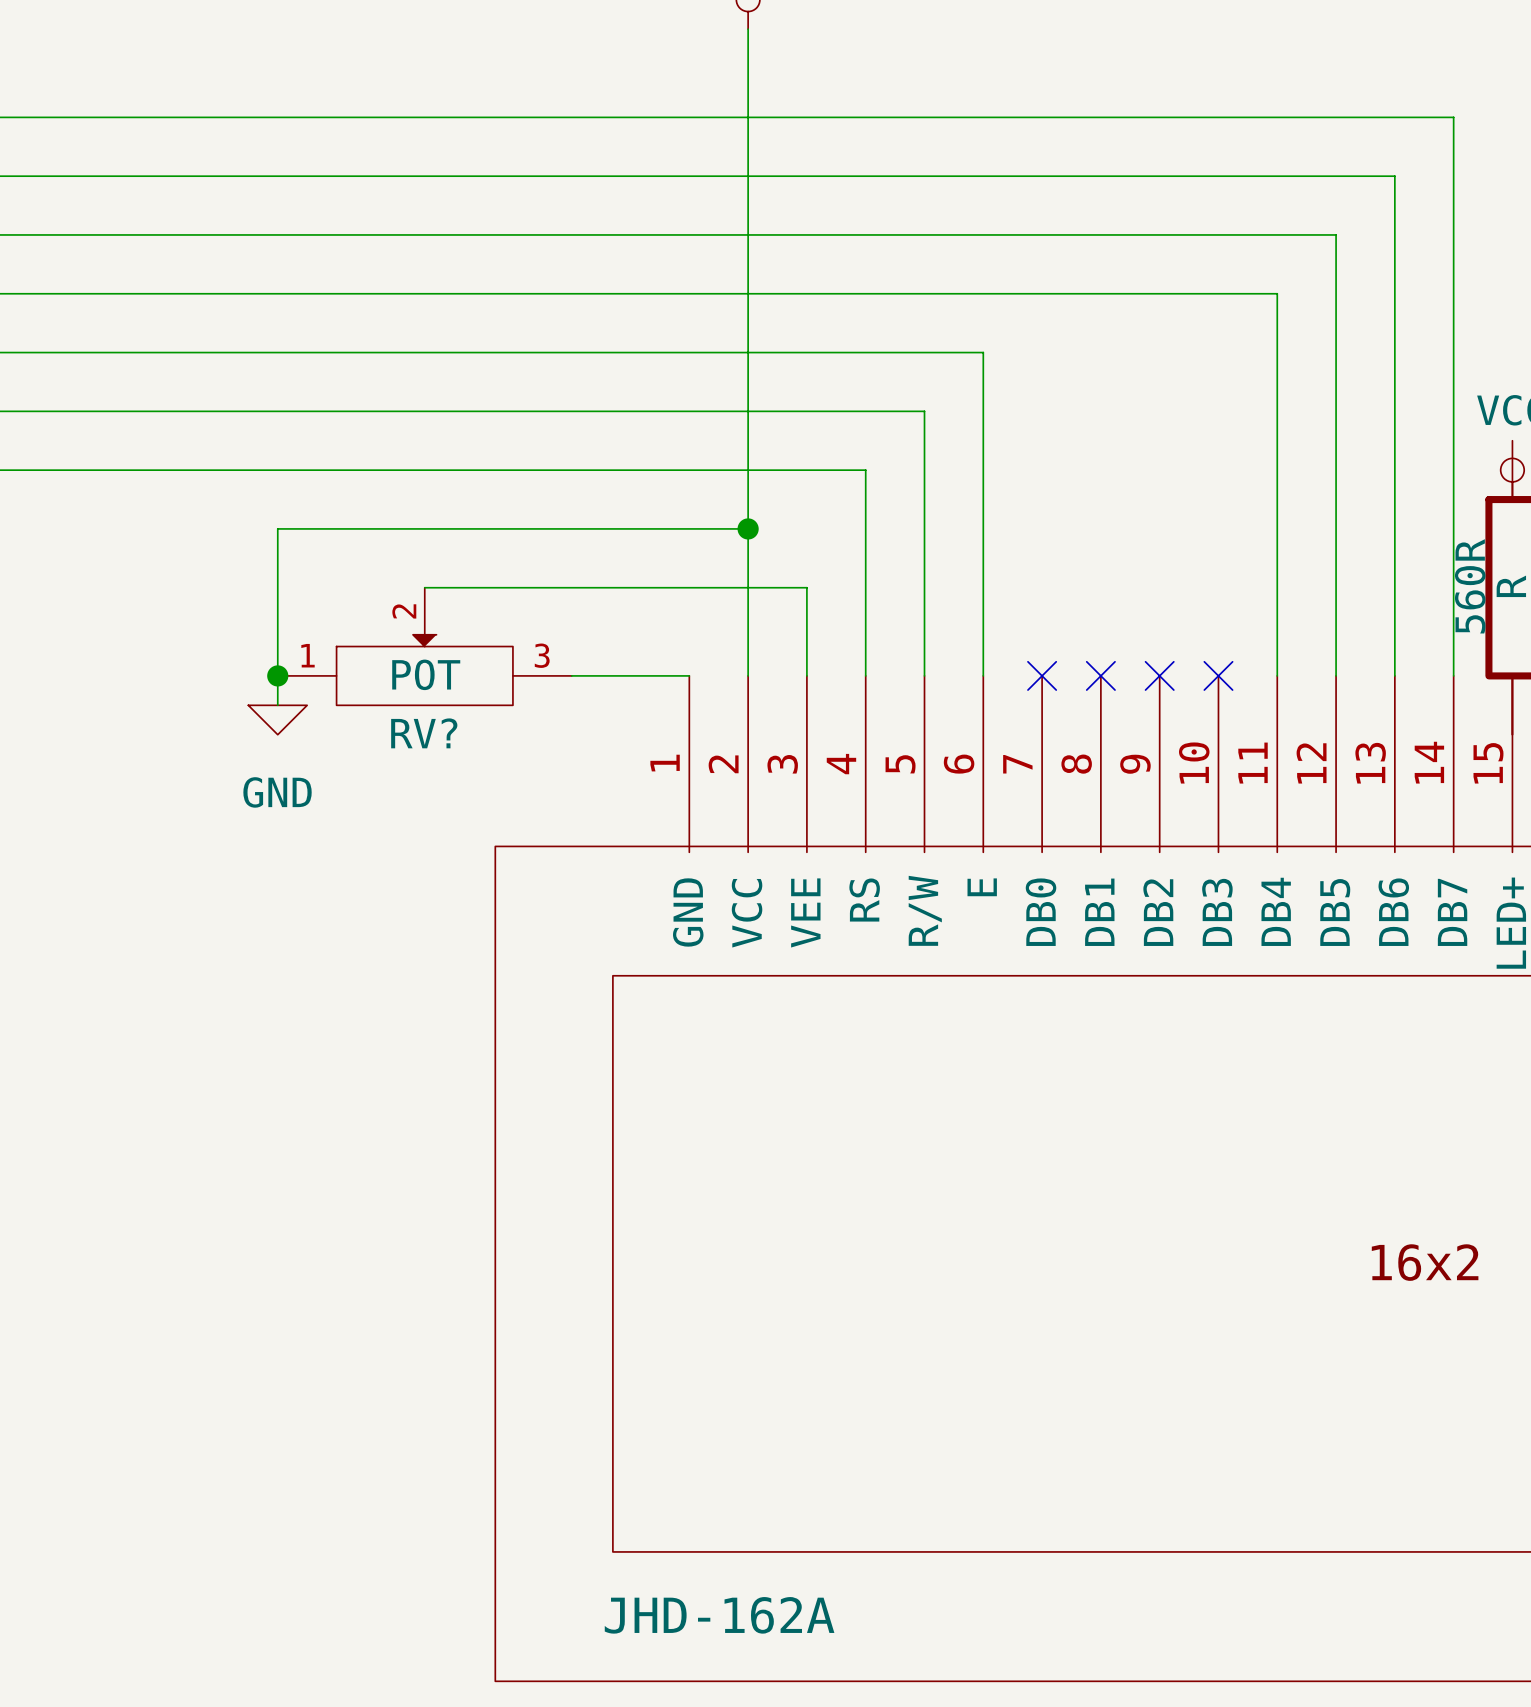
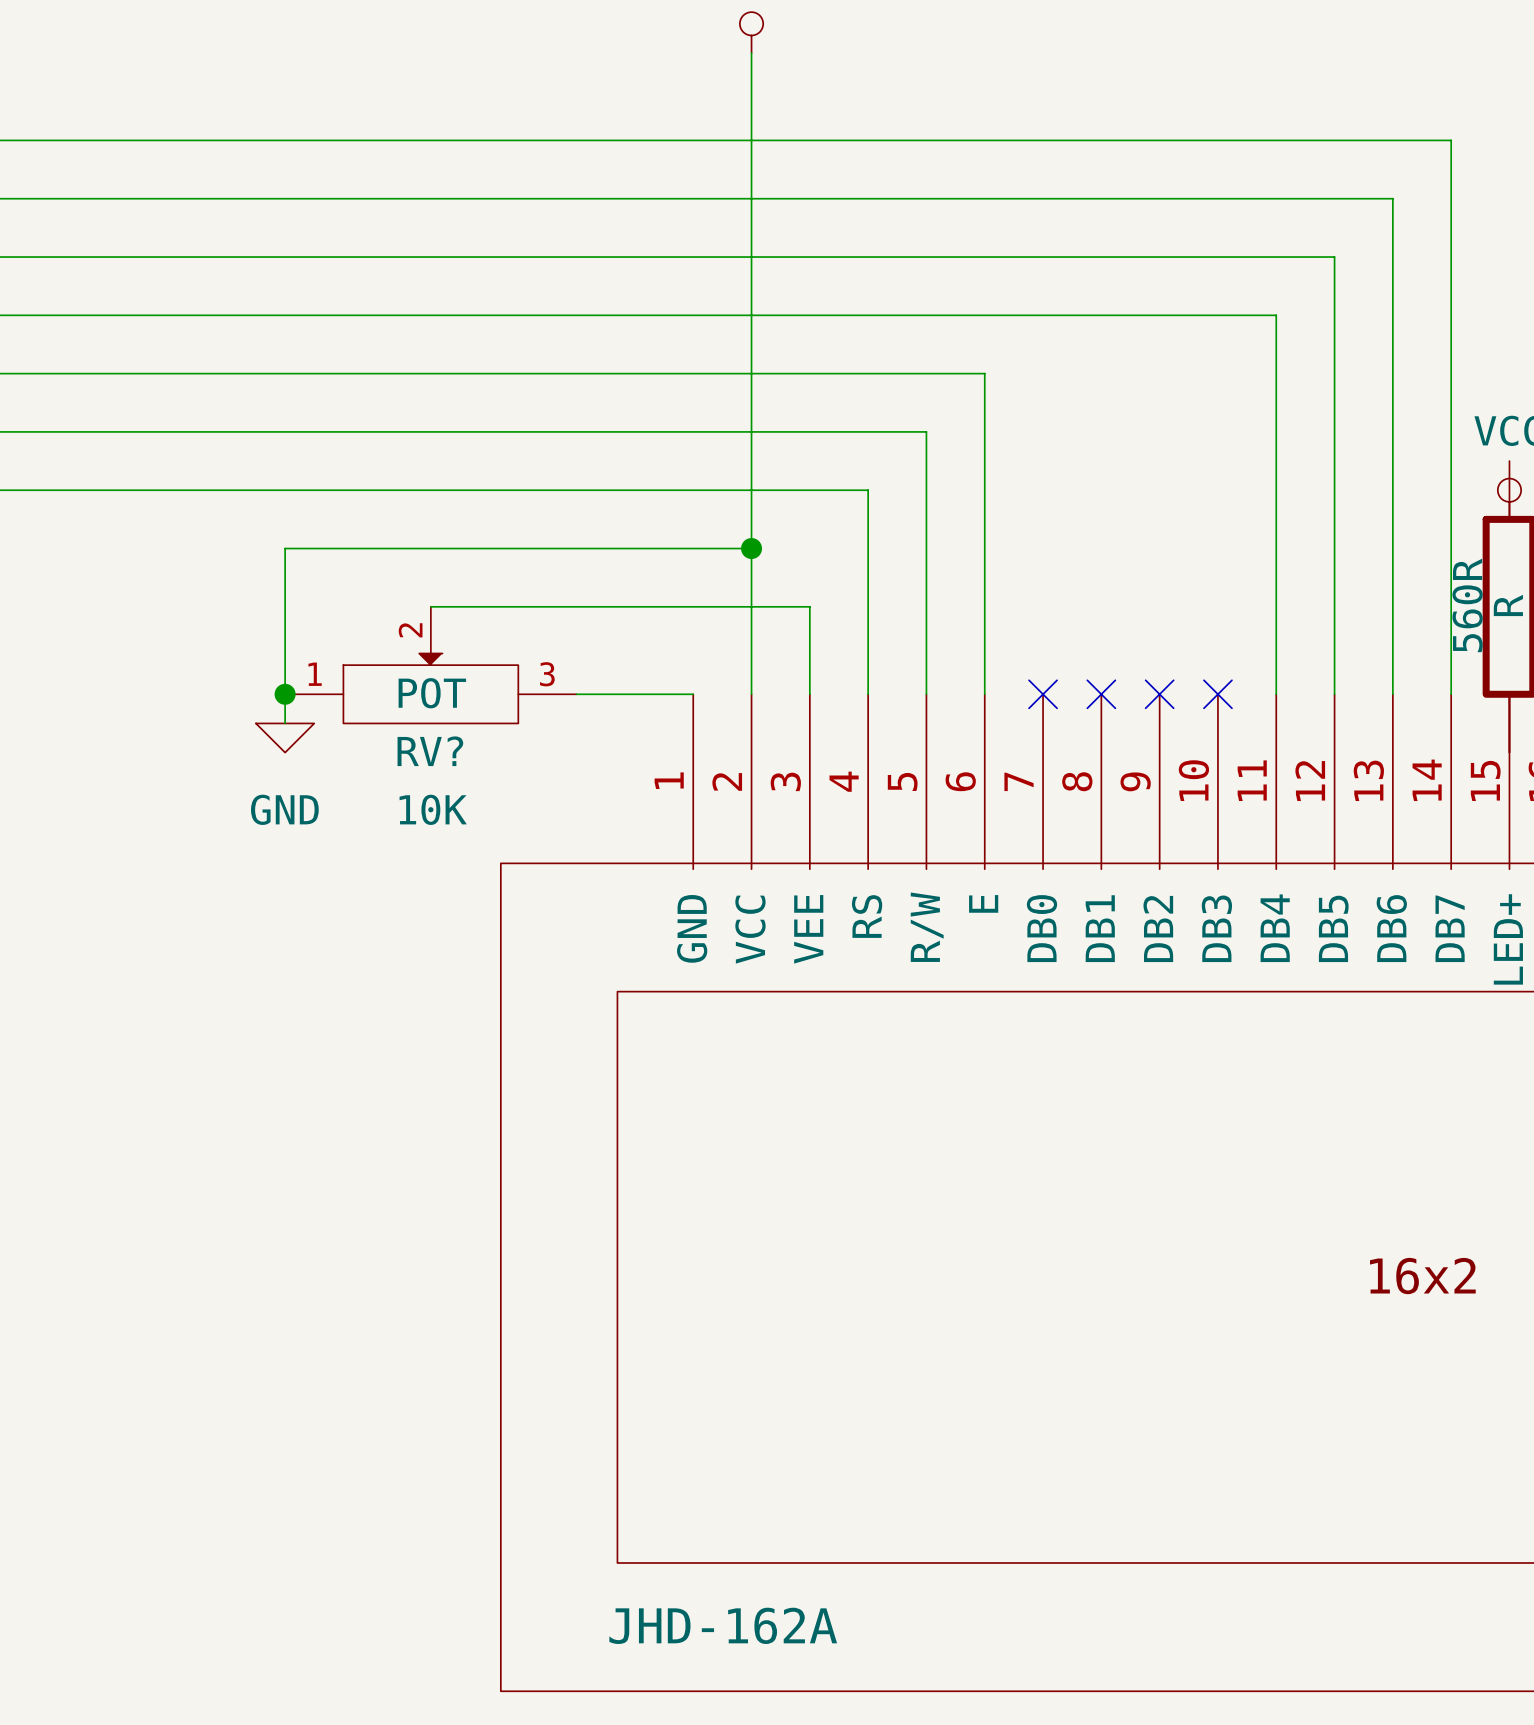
RV? text: none -> 10K (433, 809)

